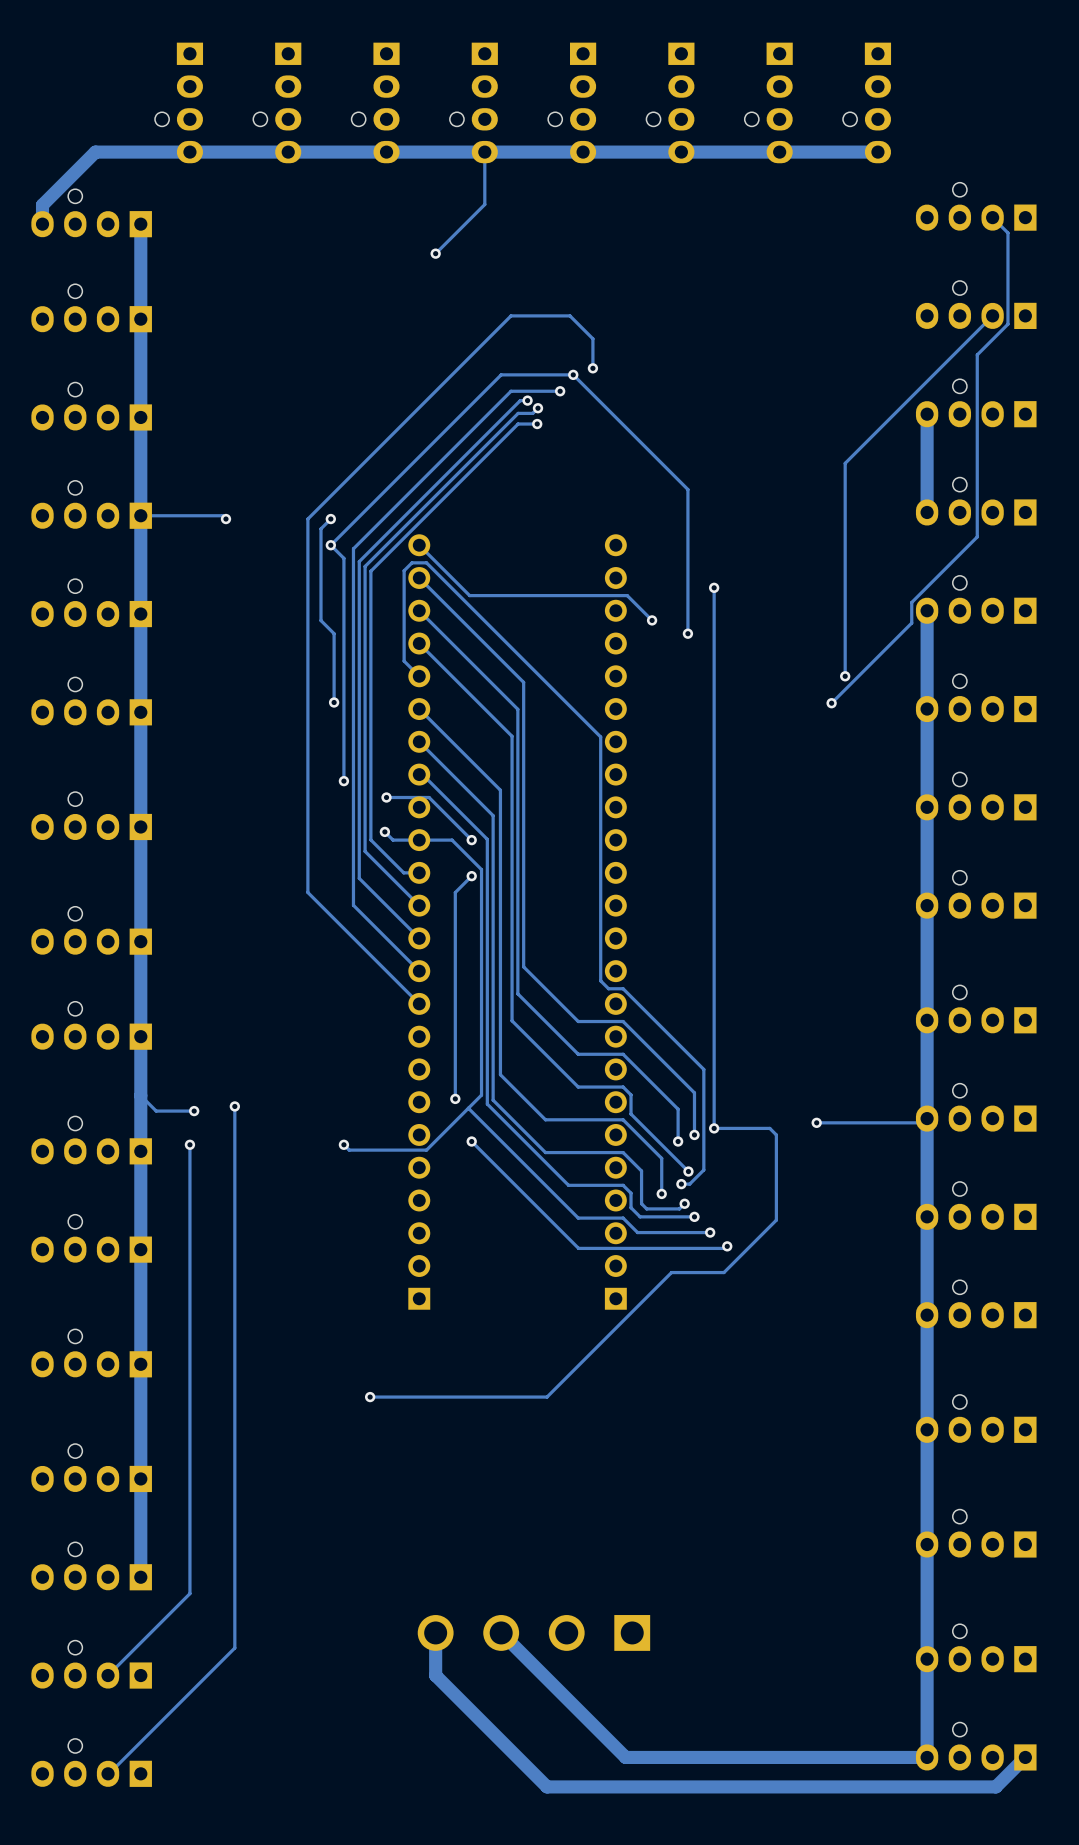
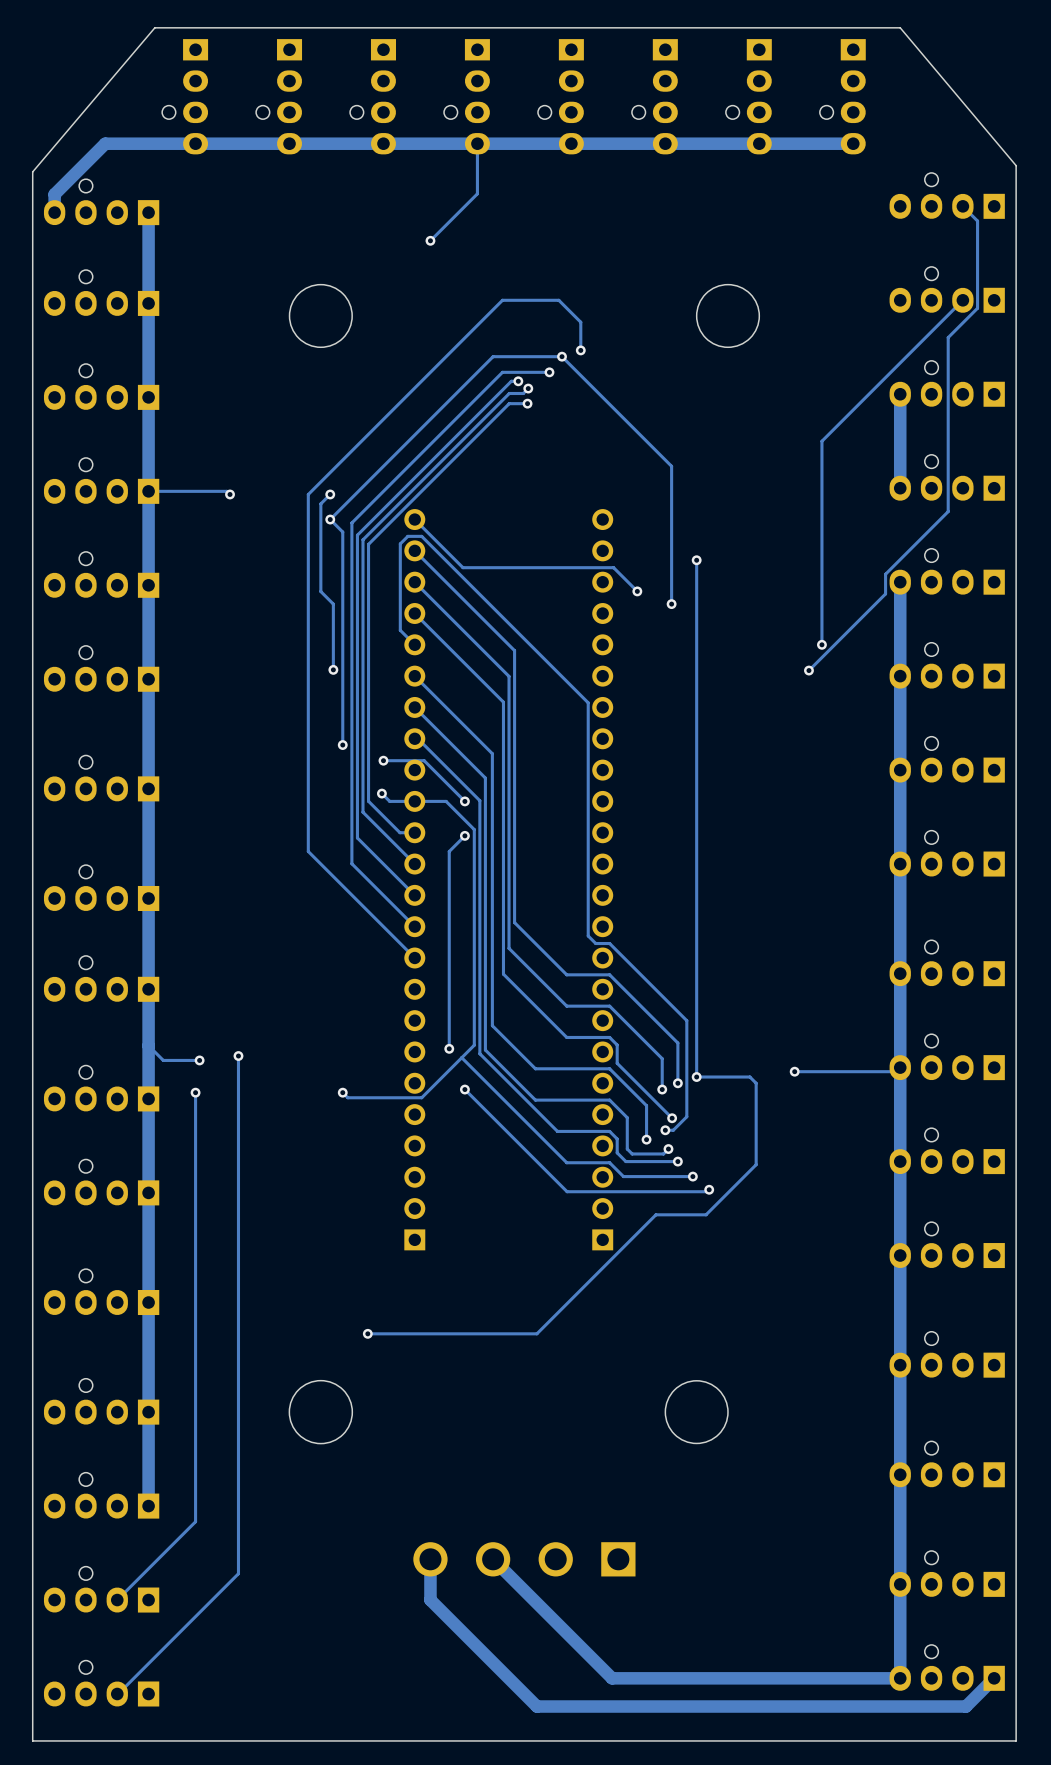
board edge: none -> (900, 27) (154, 27) (32, 171) (32, 1740) (1016, 1740) (1016, 165) (900, 27)
round board edge: none -> [289, 284, 353, 348]
round board edge: none -> [696, 284, 760, 348]
round board edge: none -> [289, 1380, 353, 1444]
round board edge: none -> [665, 1380, 729, 1444]

